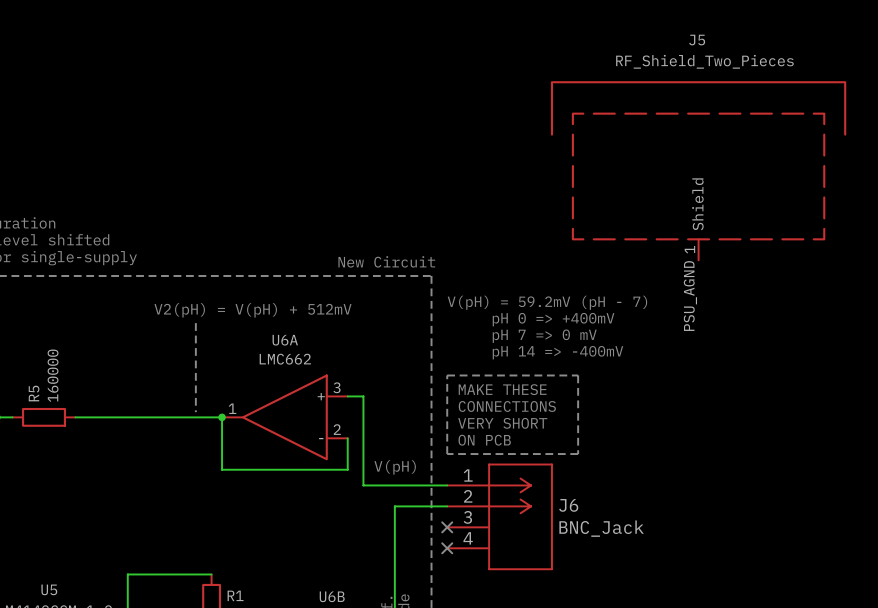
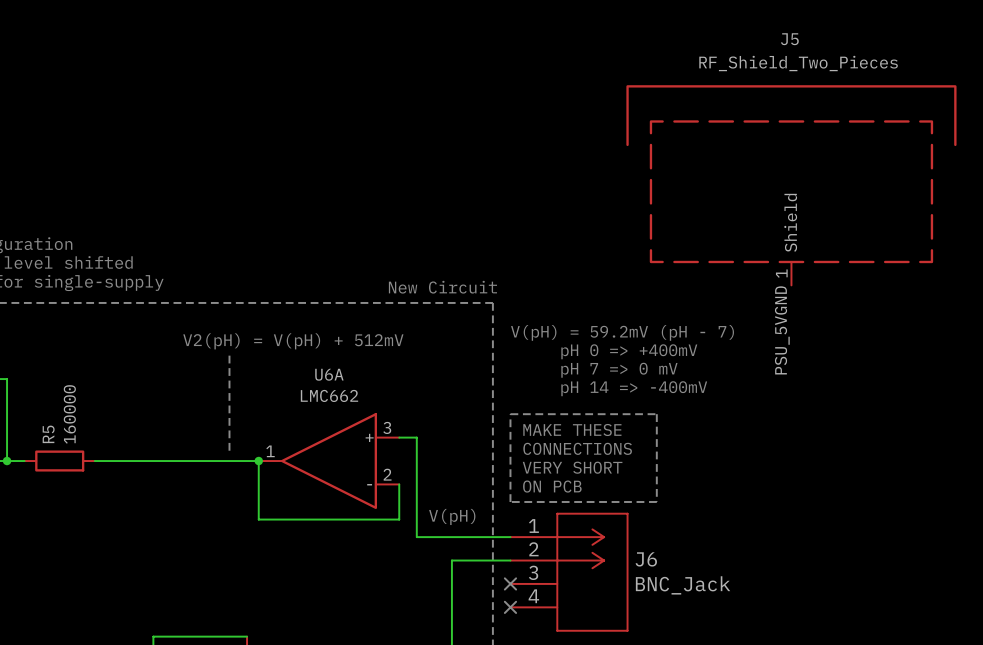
label: PSU_AGND (690, 296) -> PSU_5VGND (782, 330)

